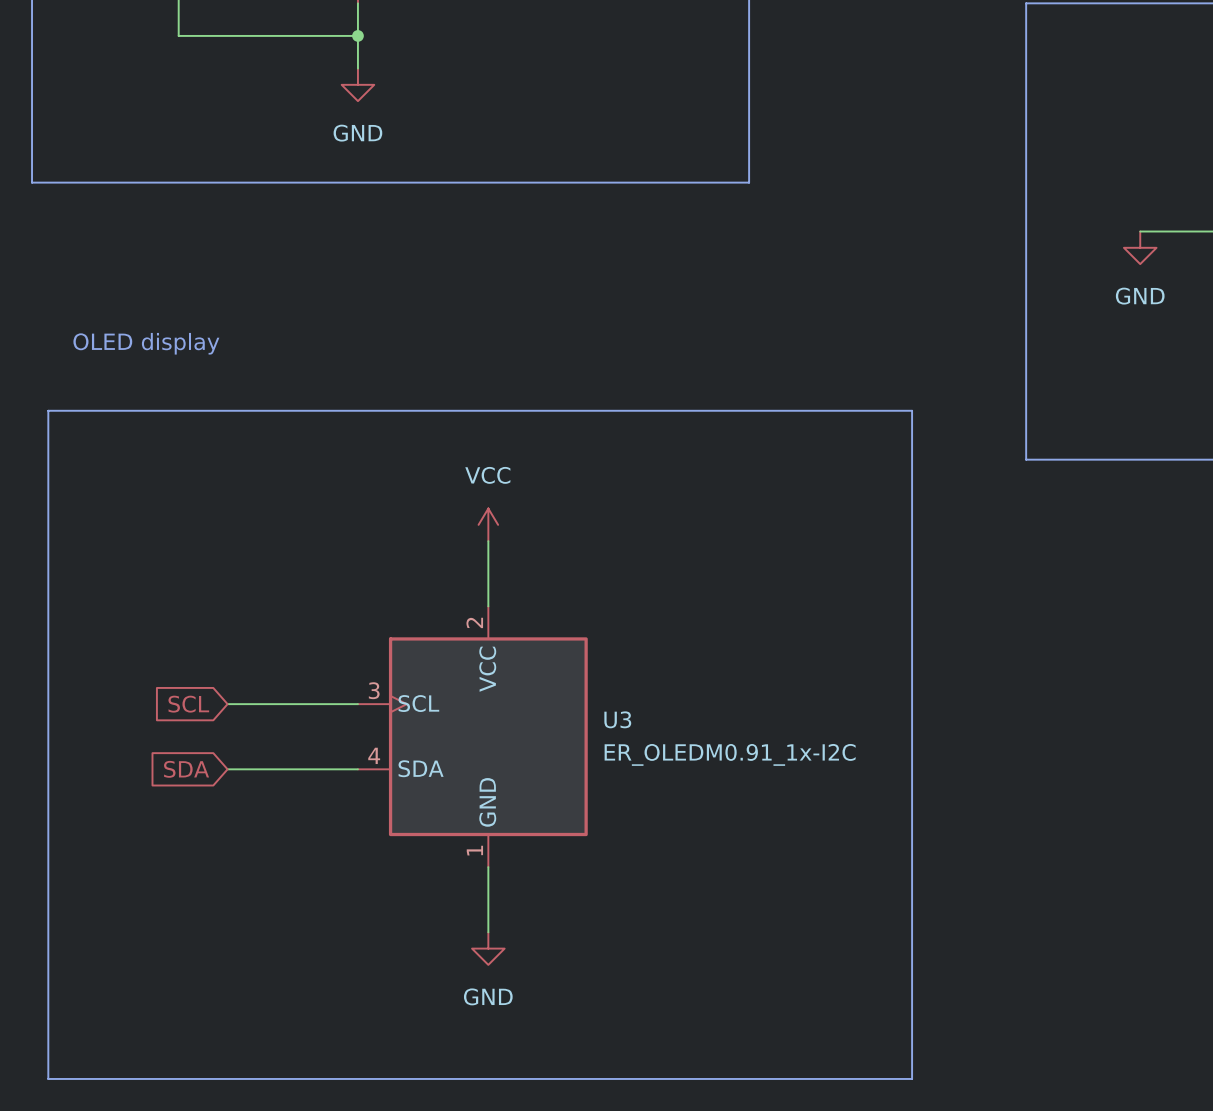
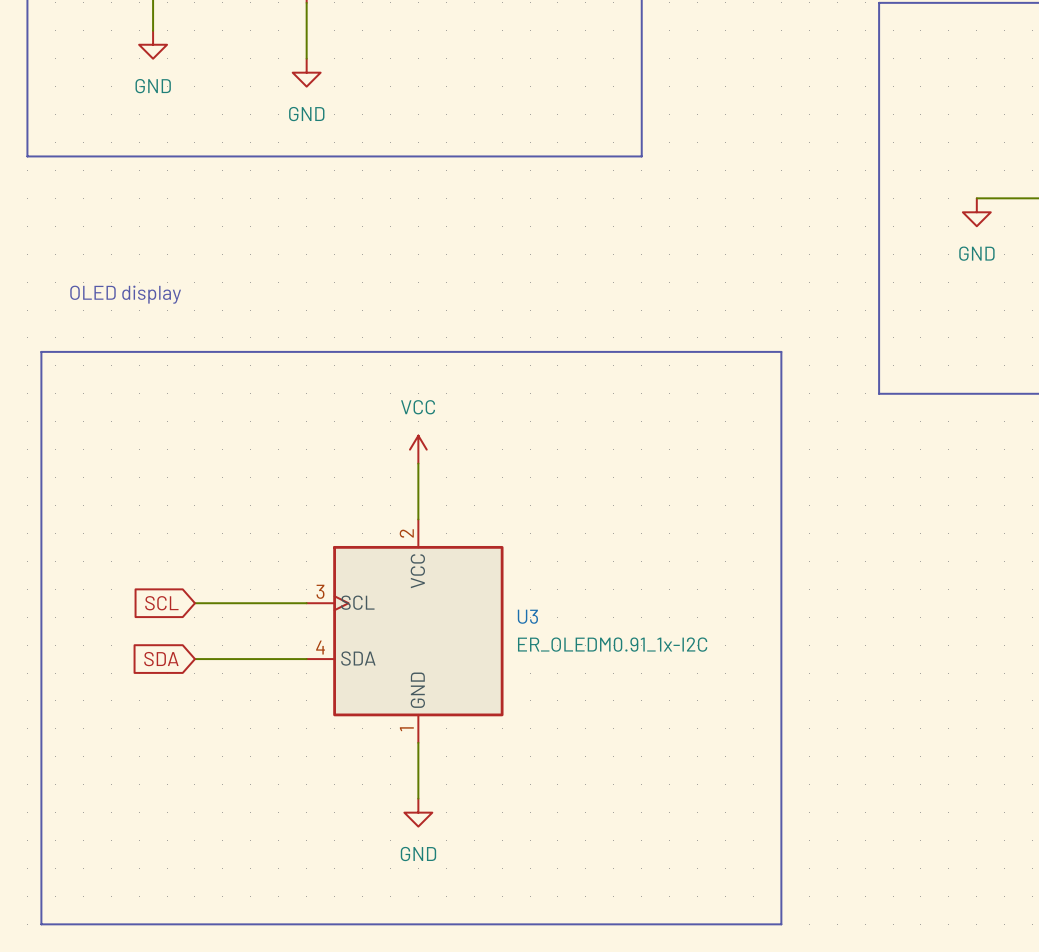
wire: (178, 35) (357, 35) -> none
junction: (357, 35) -> none
power symbol: none -> GND (153, 44)

